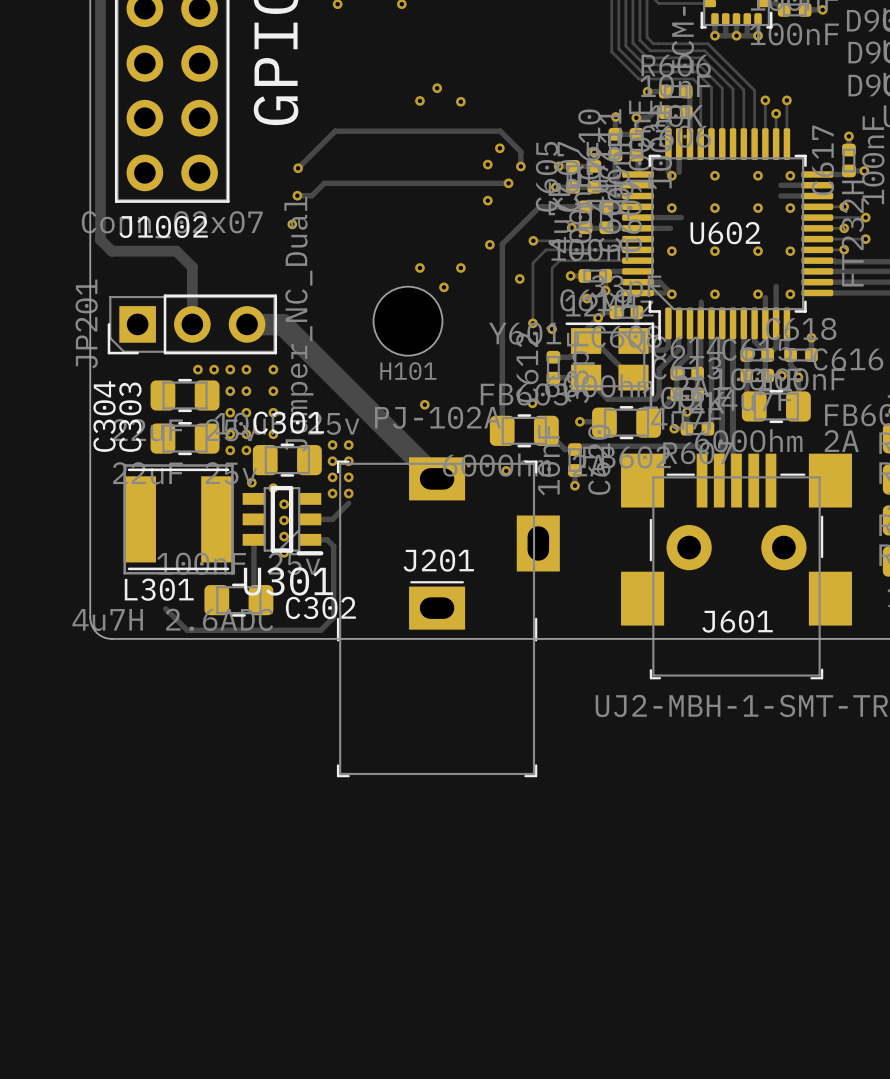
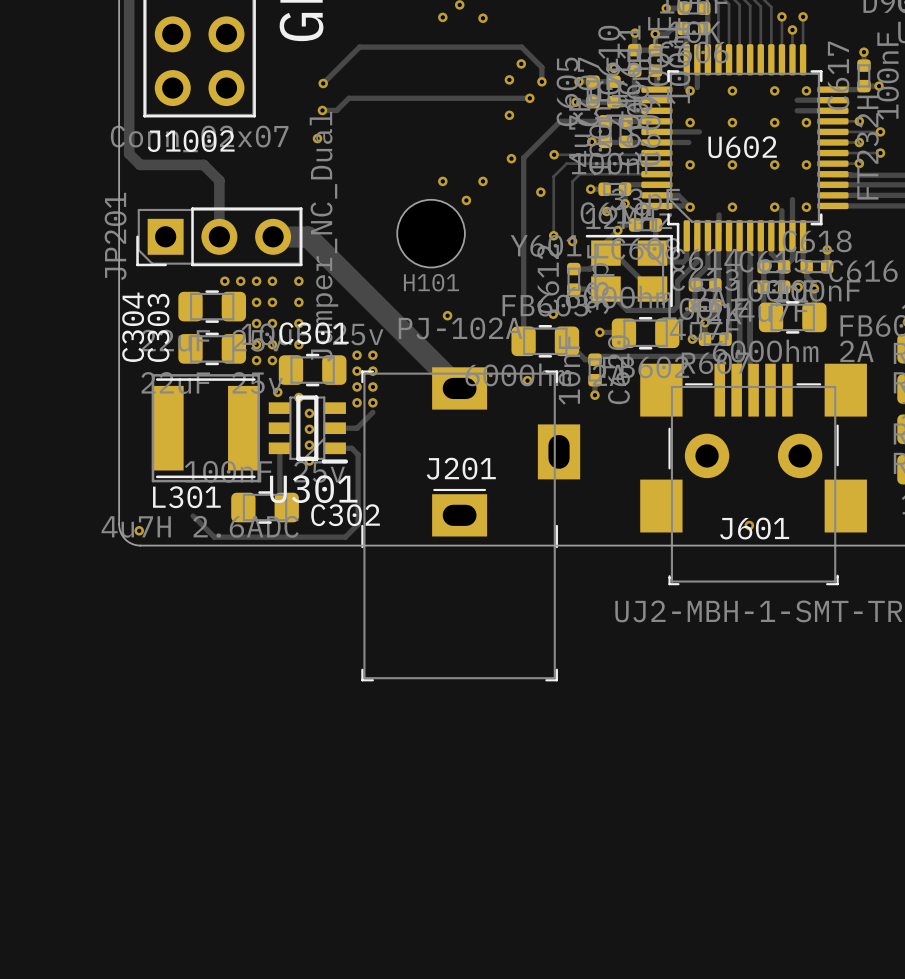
via: none -> (749, 525)
via: none -> (139, 530)

